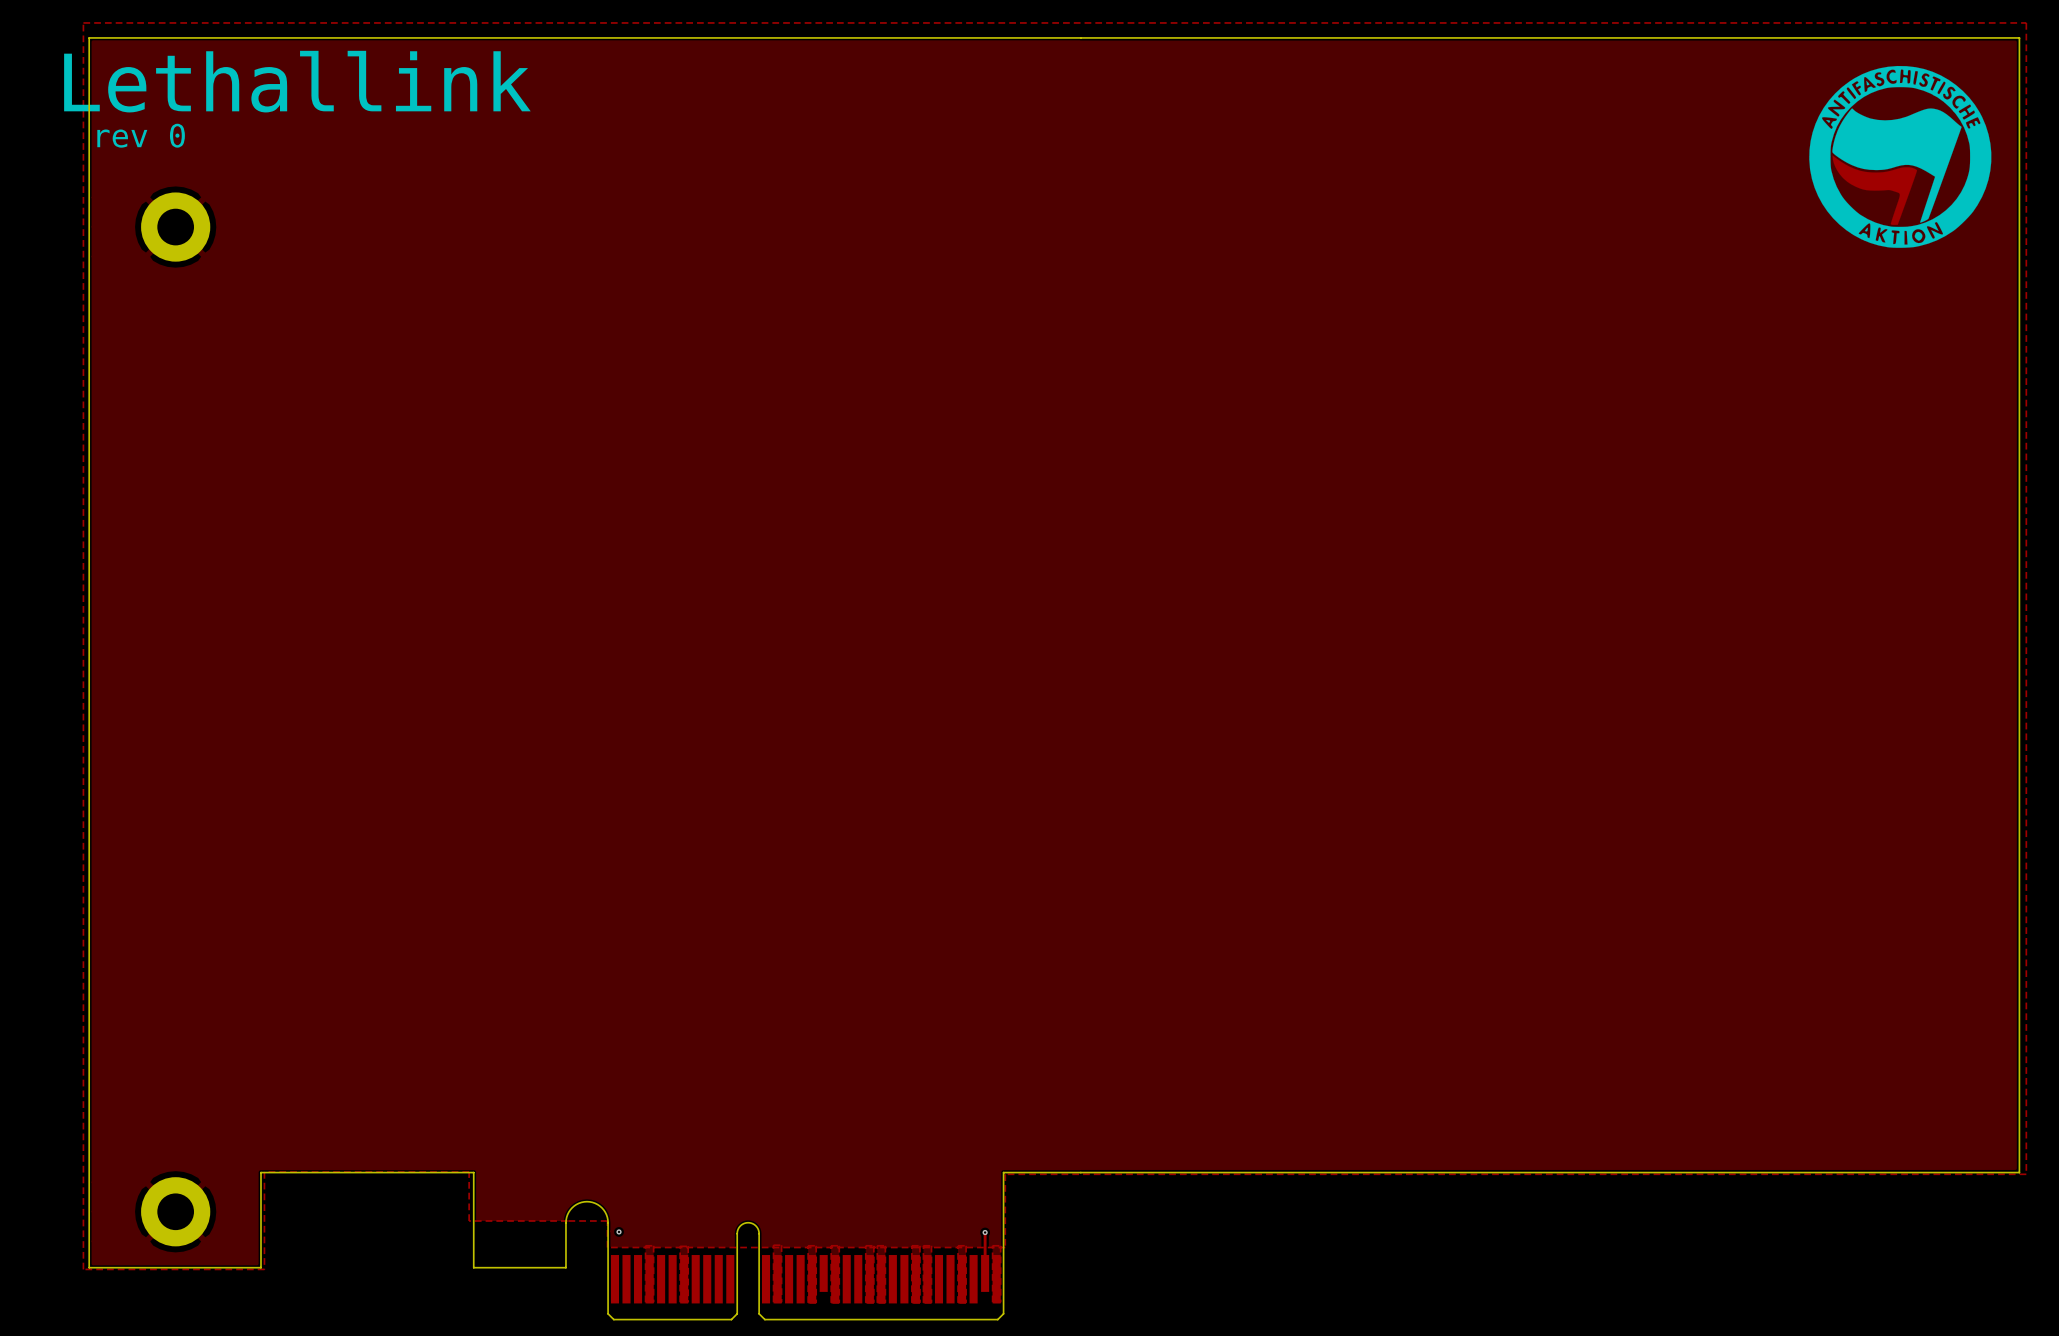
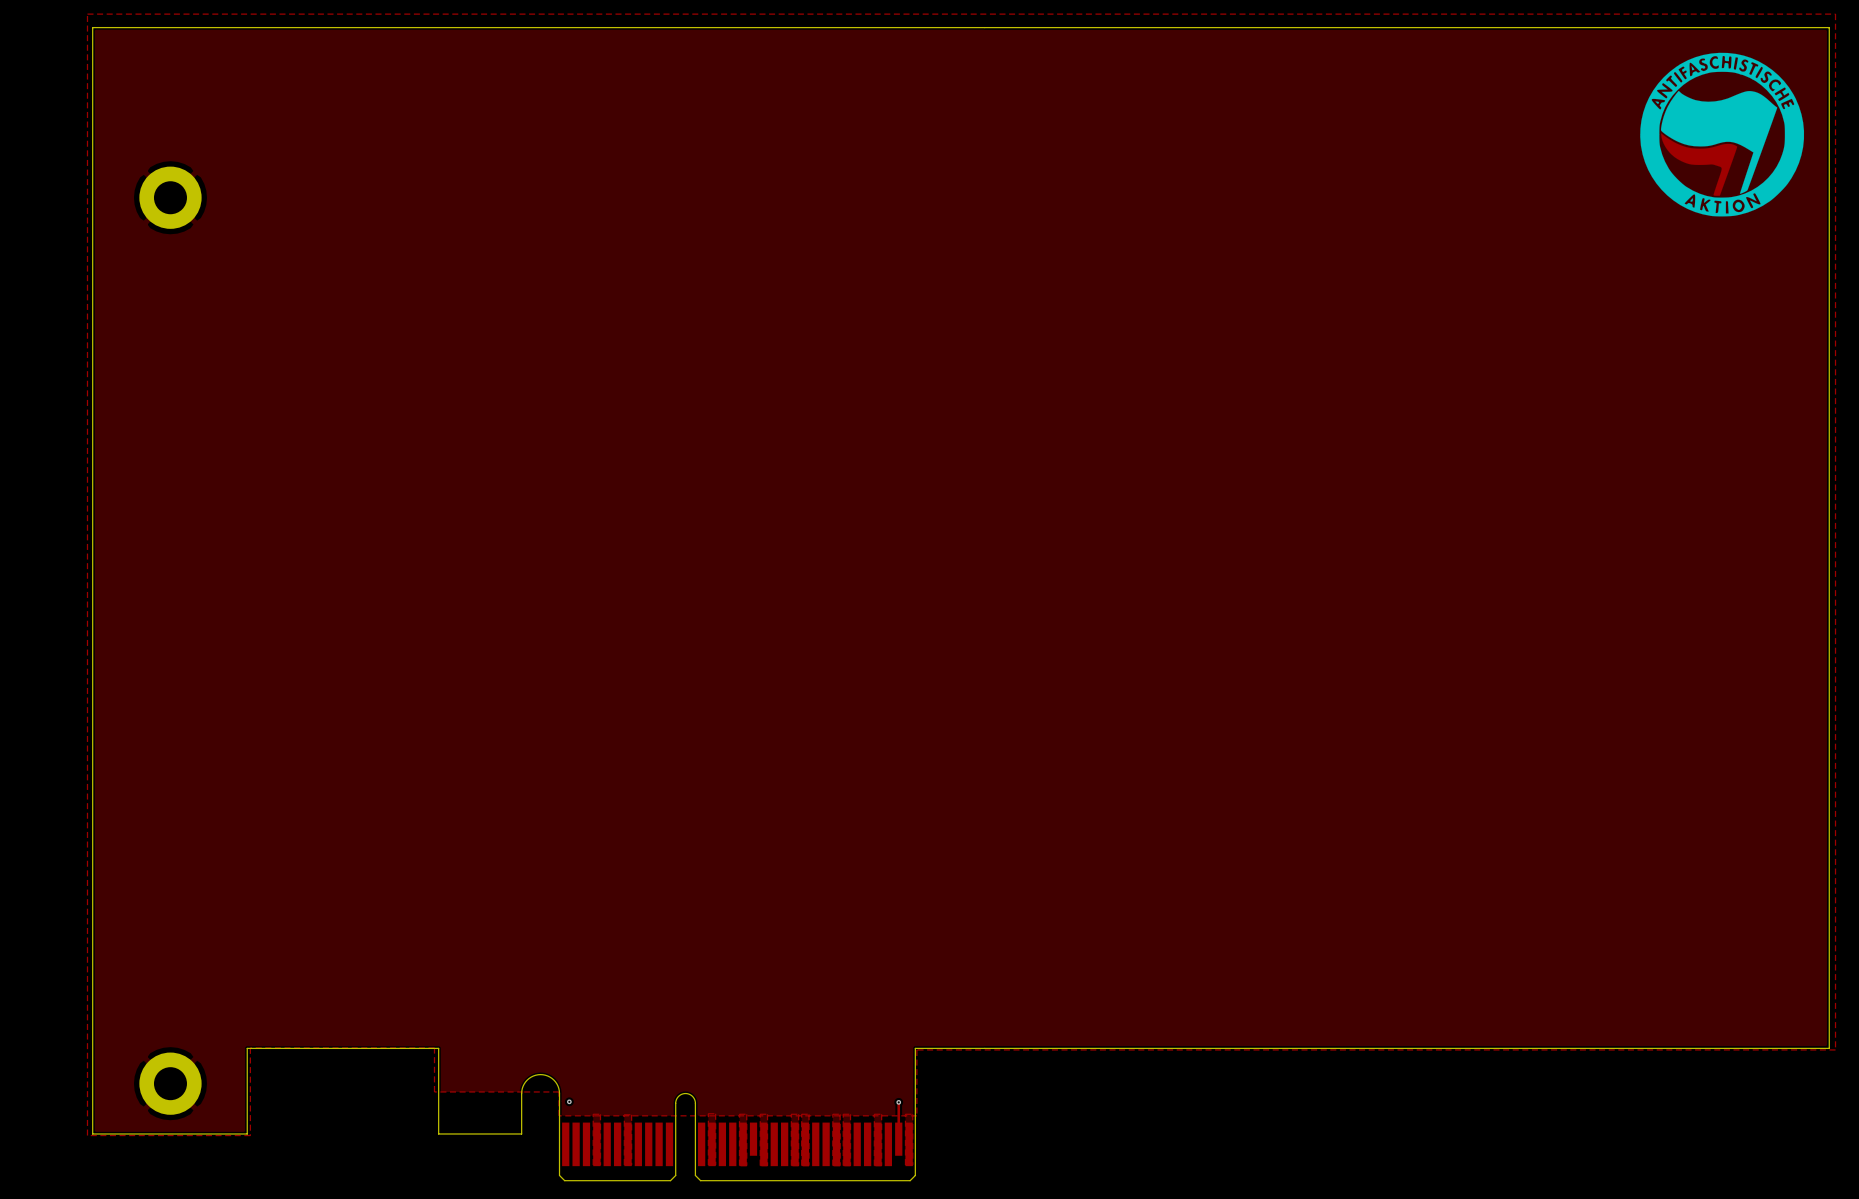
text: Lethallink (297, 81) -> none
text: rev 0 (141, 135) -> none

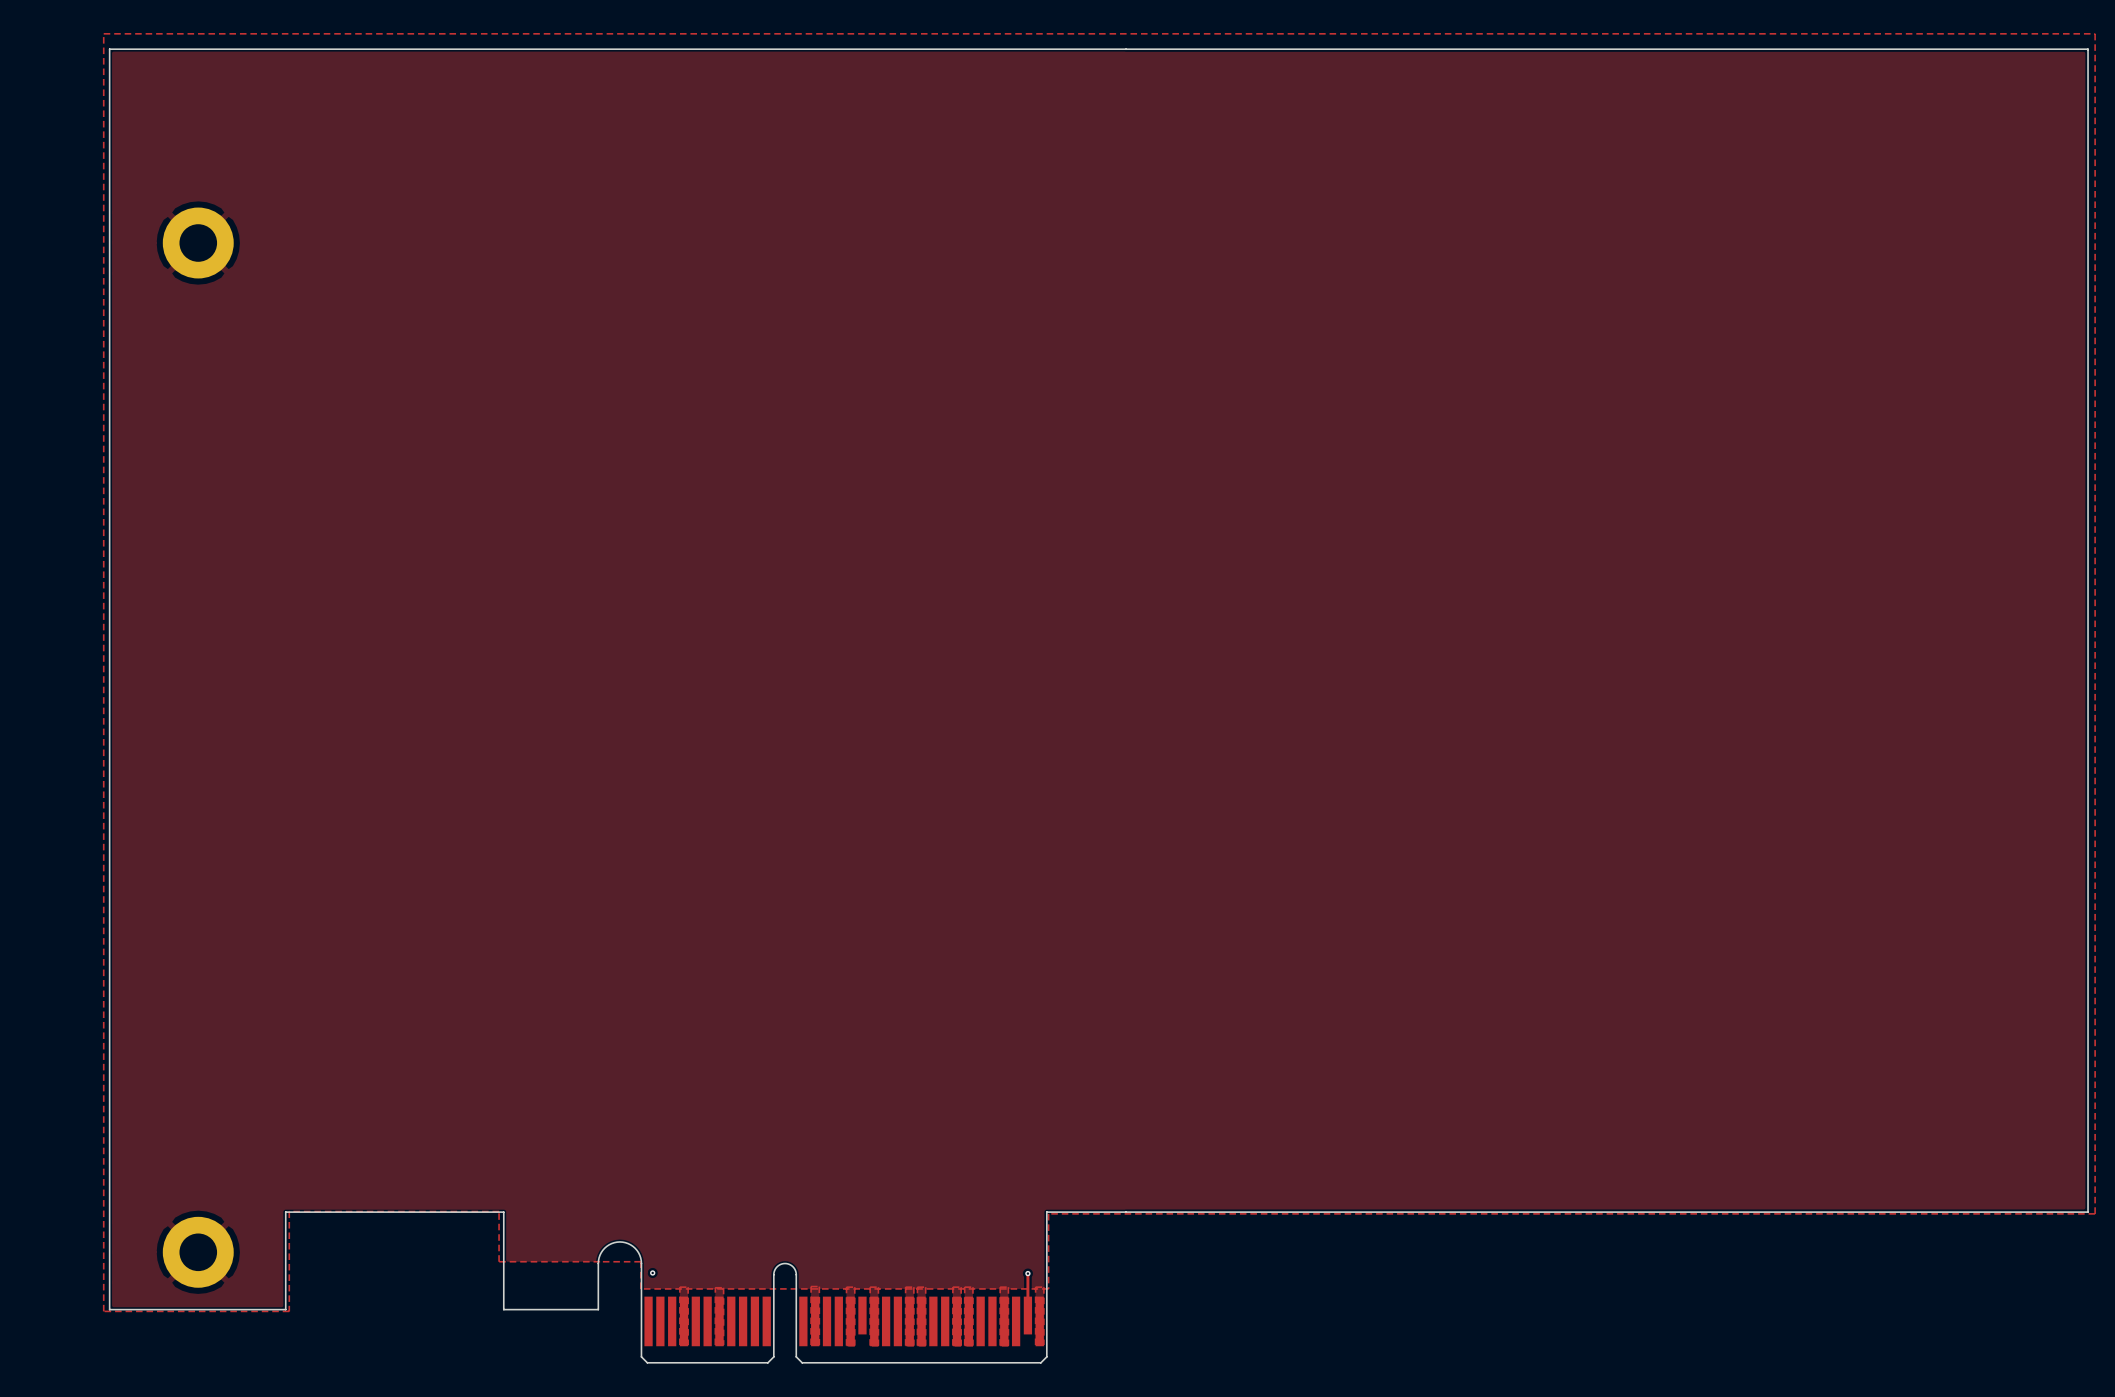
drawing: [1640, 52, 1805, 217] -> none

